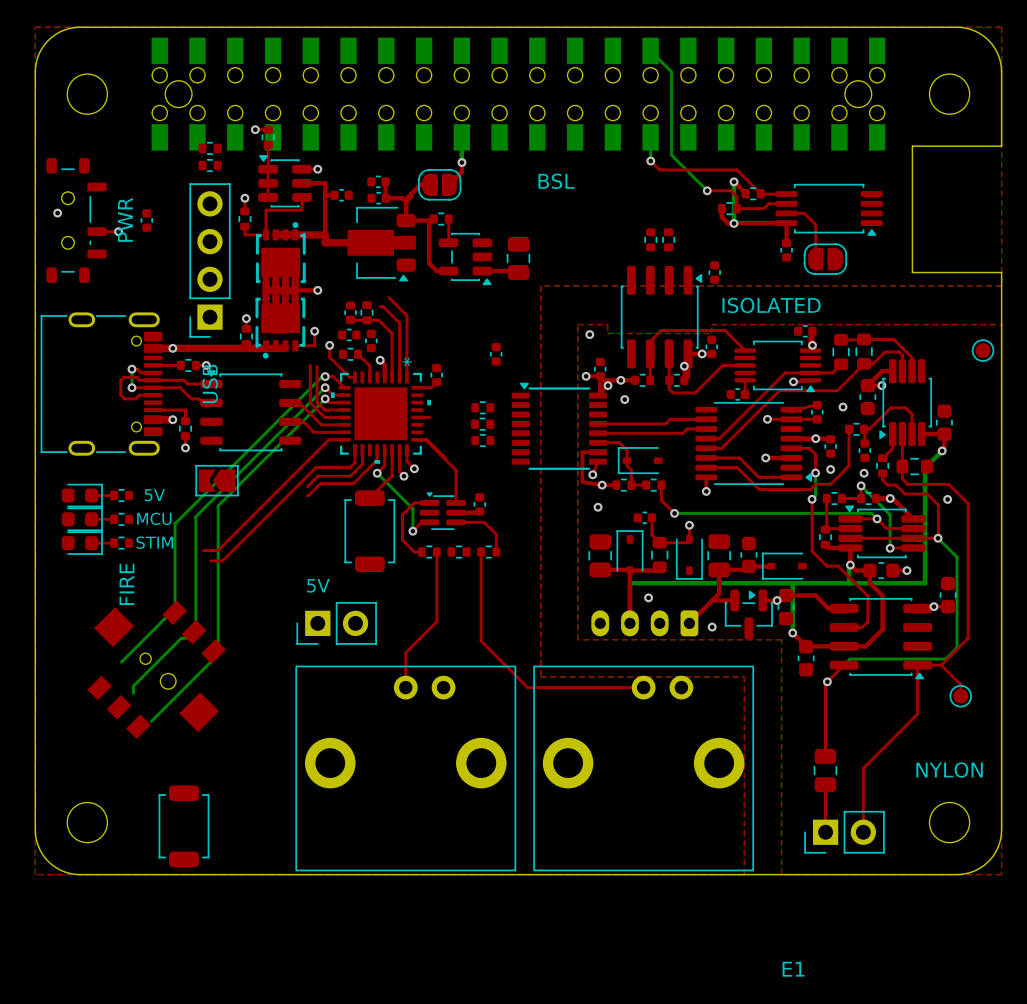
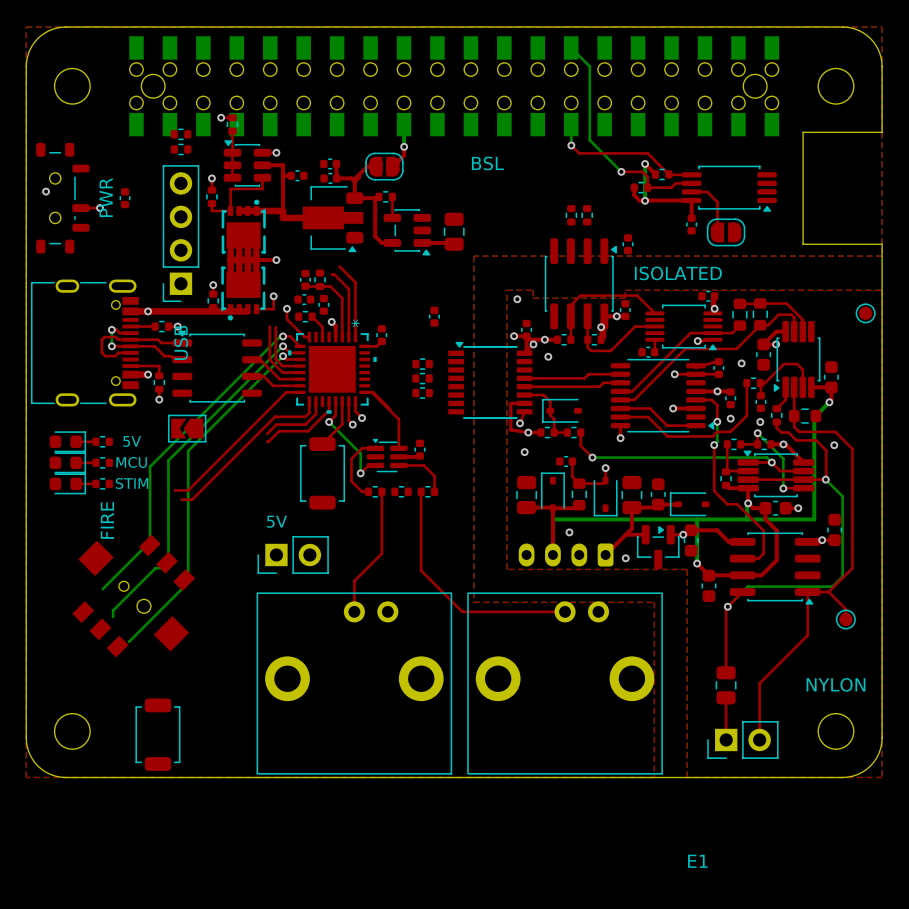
top track: (417, 417) (430, 417) -> none

